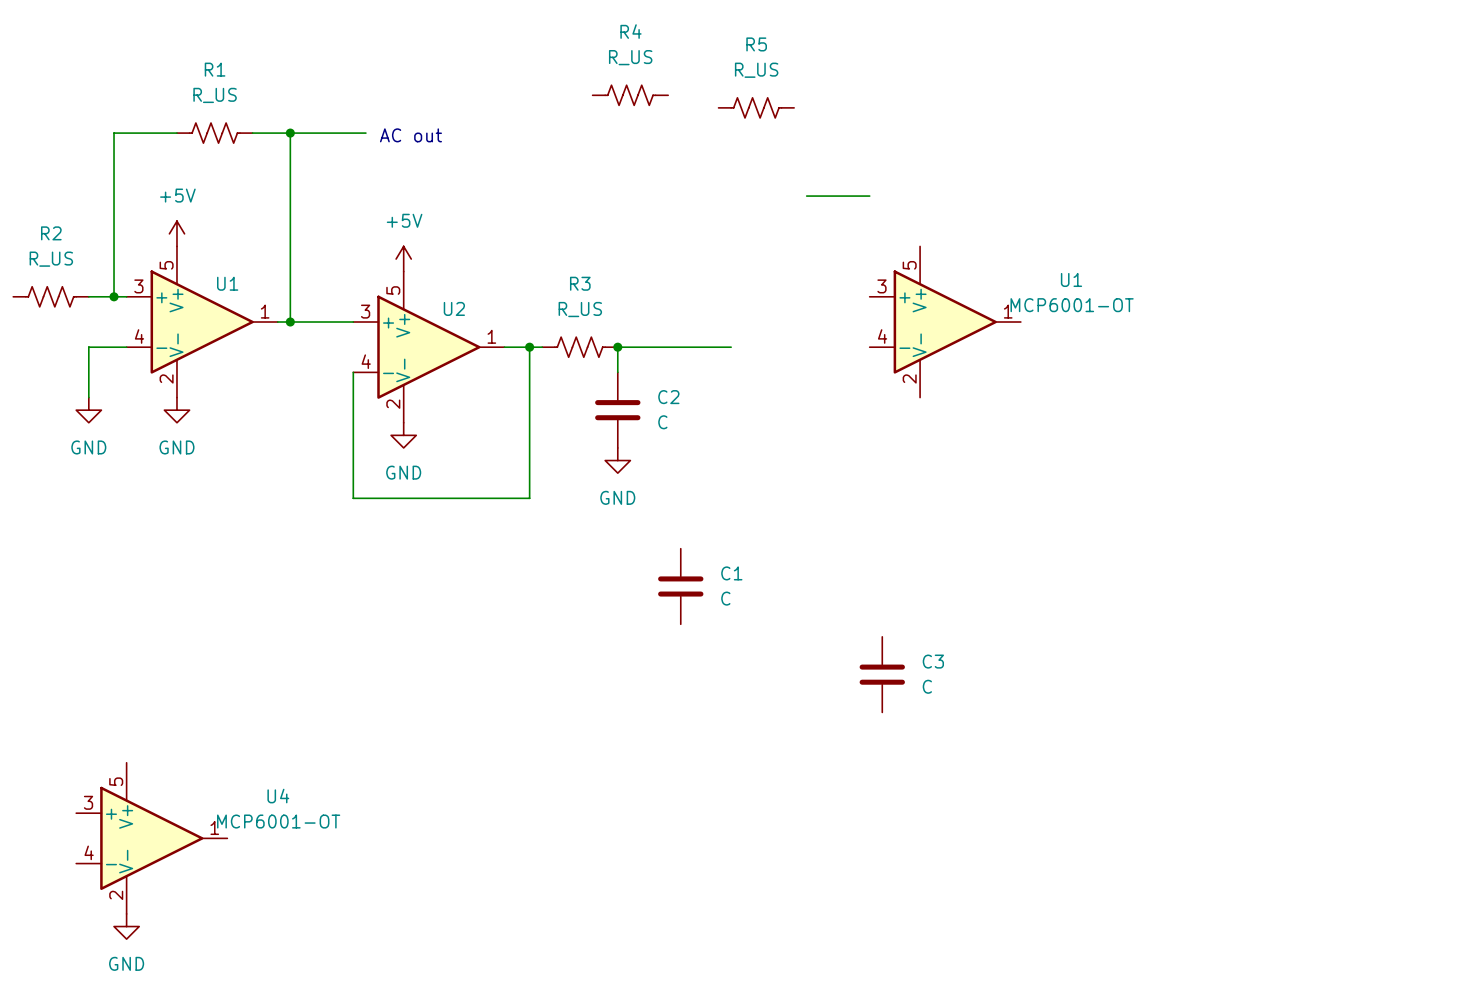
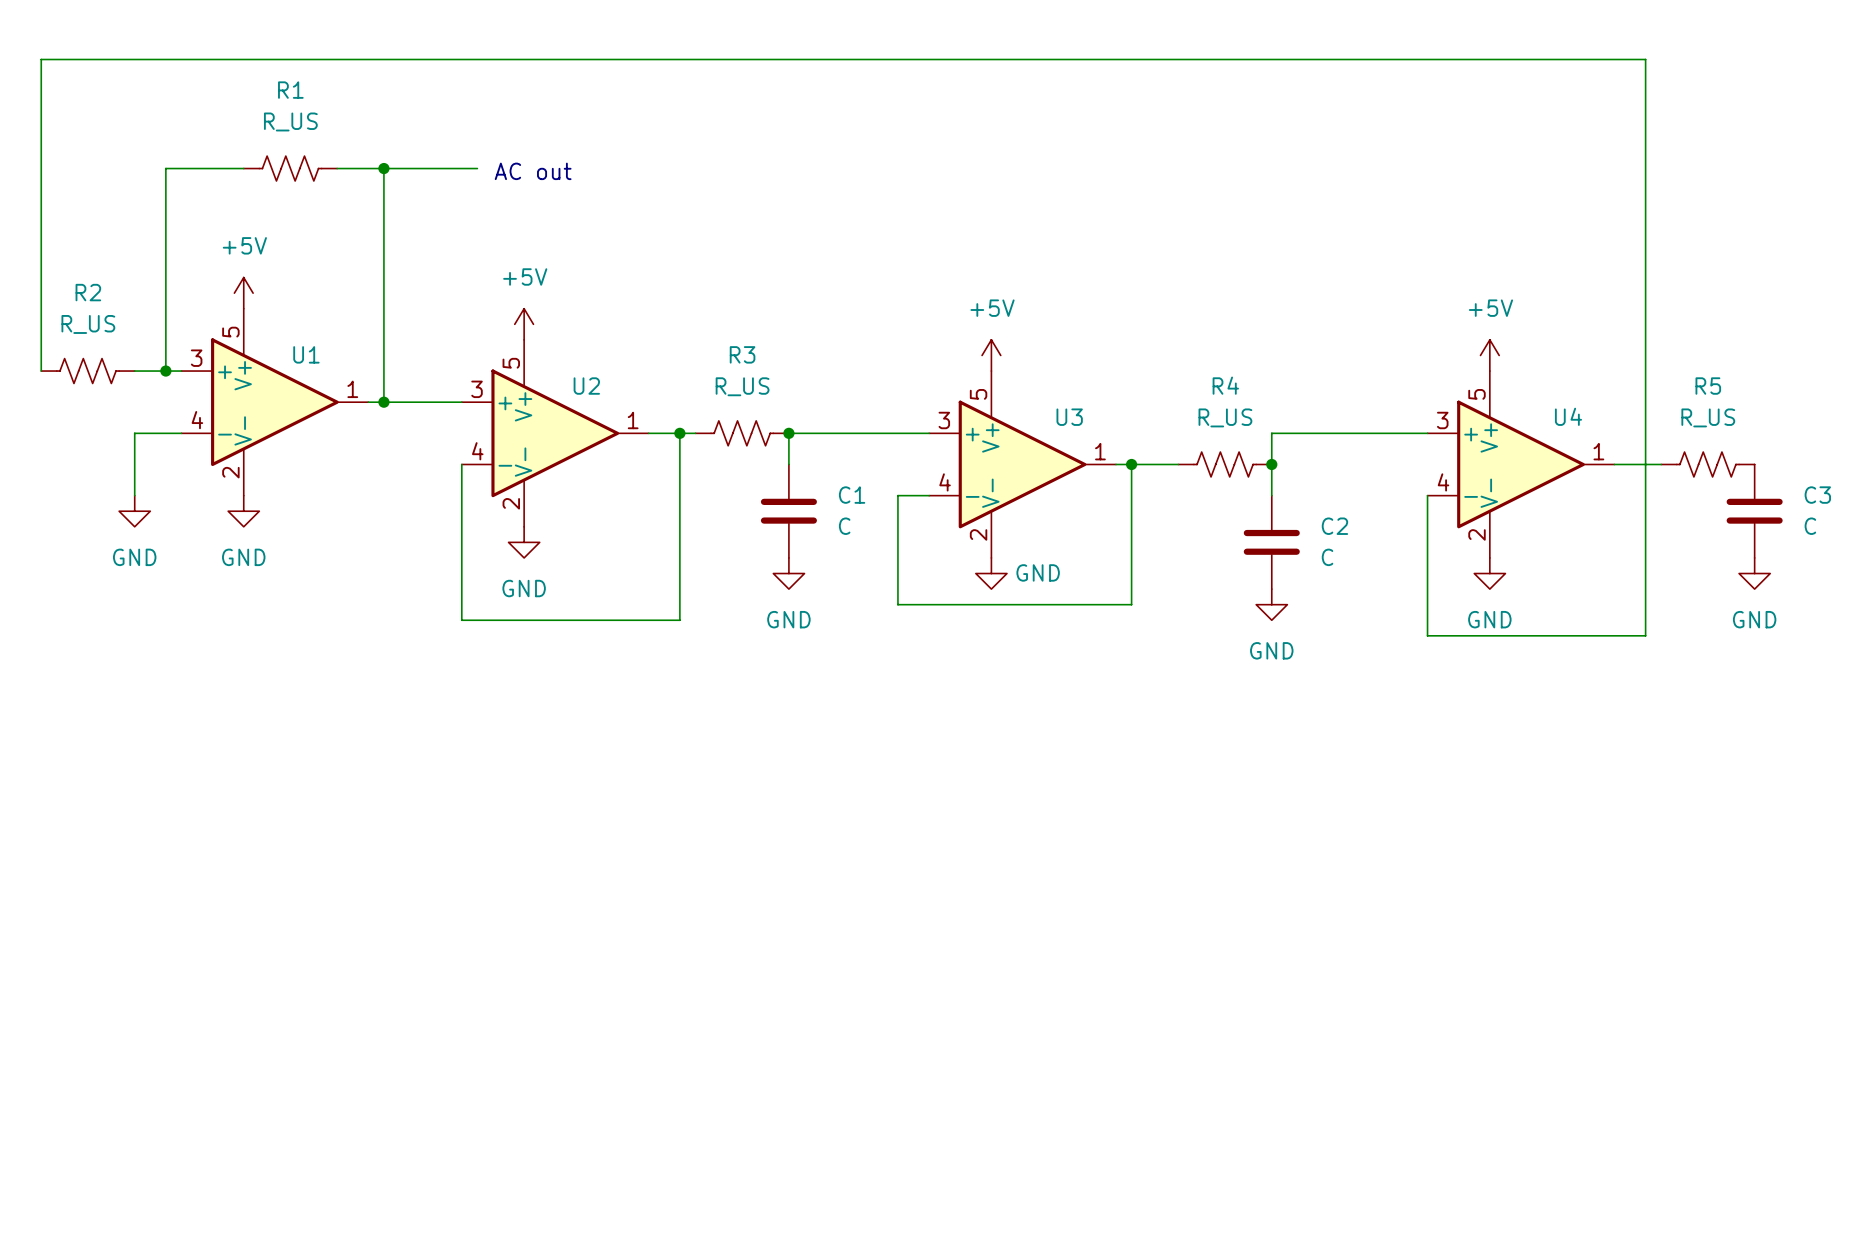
R4 position: (630, 95) -> (1225, 464)
R5 position: (756, 107) -> (1707, 464)
wire: (806, 196) (869, 196) -> none
power symbol: none -> +5V (991, 355)
power symbol: none -> +5V (1489, 355)
wire: none -> (41, 371) (41, 59) (1645, 59) (1645, 635) (1427, 635) (1427, 495)
U1: MCP6001-OT (945, 322) -> none
wire: none -> (1427, 433) (1271, 433) (1271, 495)
U3: none -> (1022, 464)
wire: none -> (1116, 464) (1178, 464)
wire: none -> (1131, 464) (1131, 604) (897, 604) (897, 495) (929, 495)
junction: none -> (1131, 464)
junction: none -> (1271, 464)
wire: none -> (1614, 464) (1661, 464)
C2 name: C2 (668, 397) -> C1 (852, 495)
C2: none -> C (1271, 542)
power symbol: none -> GND (991, 573)
power symbol: none -> GND (1489, 573)
power symbol: none -> GND (1754, 573)
power symbol: none -> GND (1271, 604)
C1: C (680, 586) -> none
C3 position: (882, 674) -> (1754, 511)
U4 name position: U4 (278, 796) -> U4 (1568, 416)
U4 value: MCP6001-OT (278, 821) -> none
U4 position: (151, 838) -> (1521, 464)
power symbol: GND (126, 926) -> none

